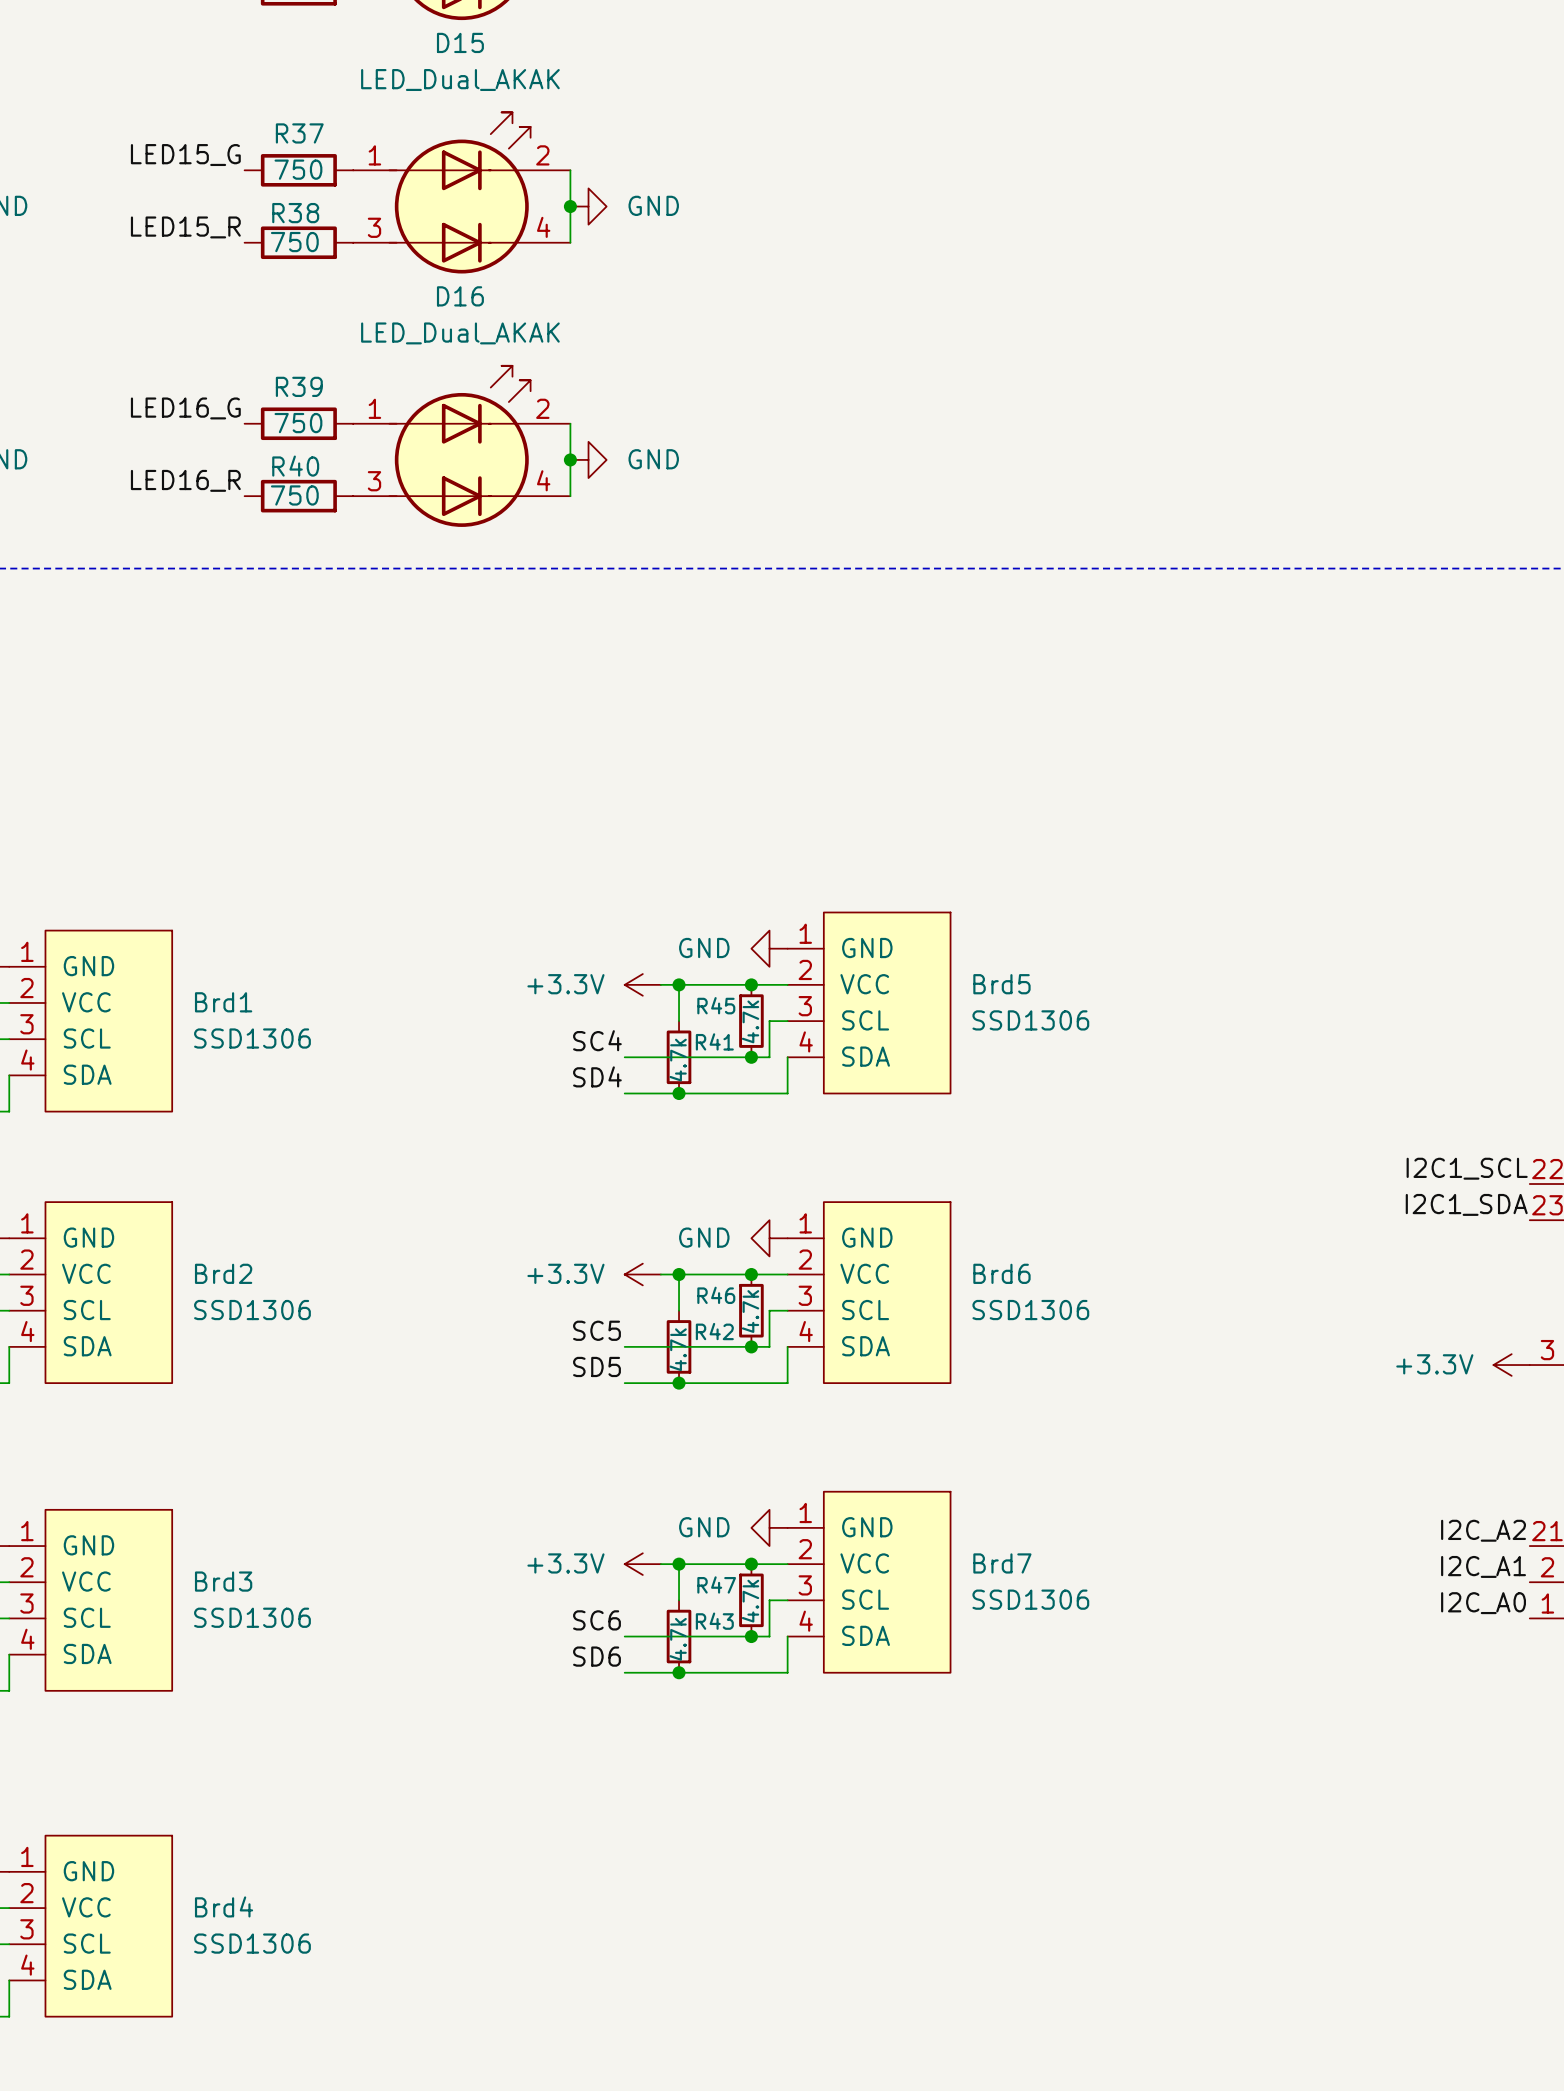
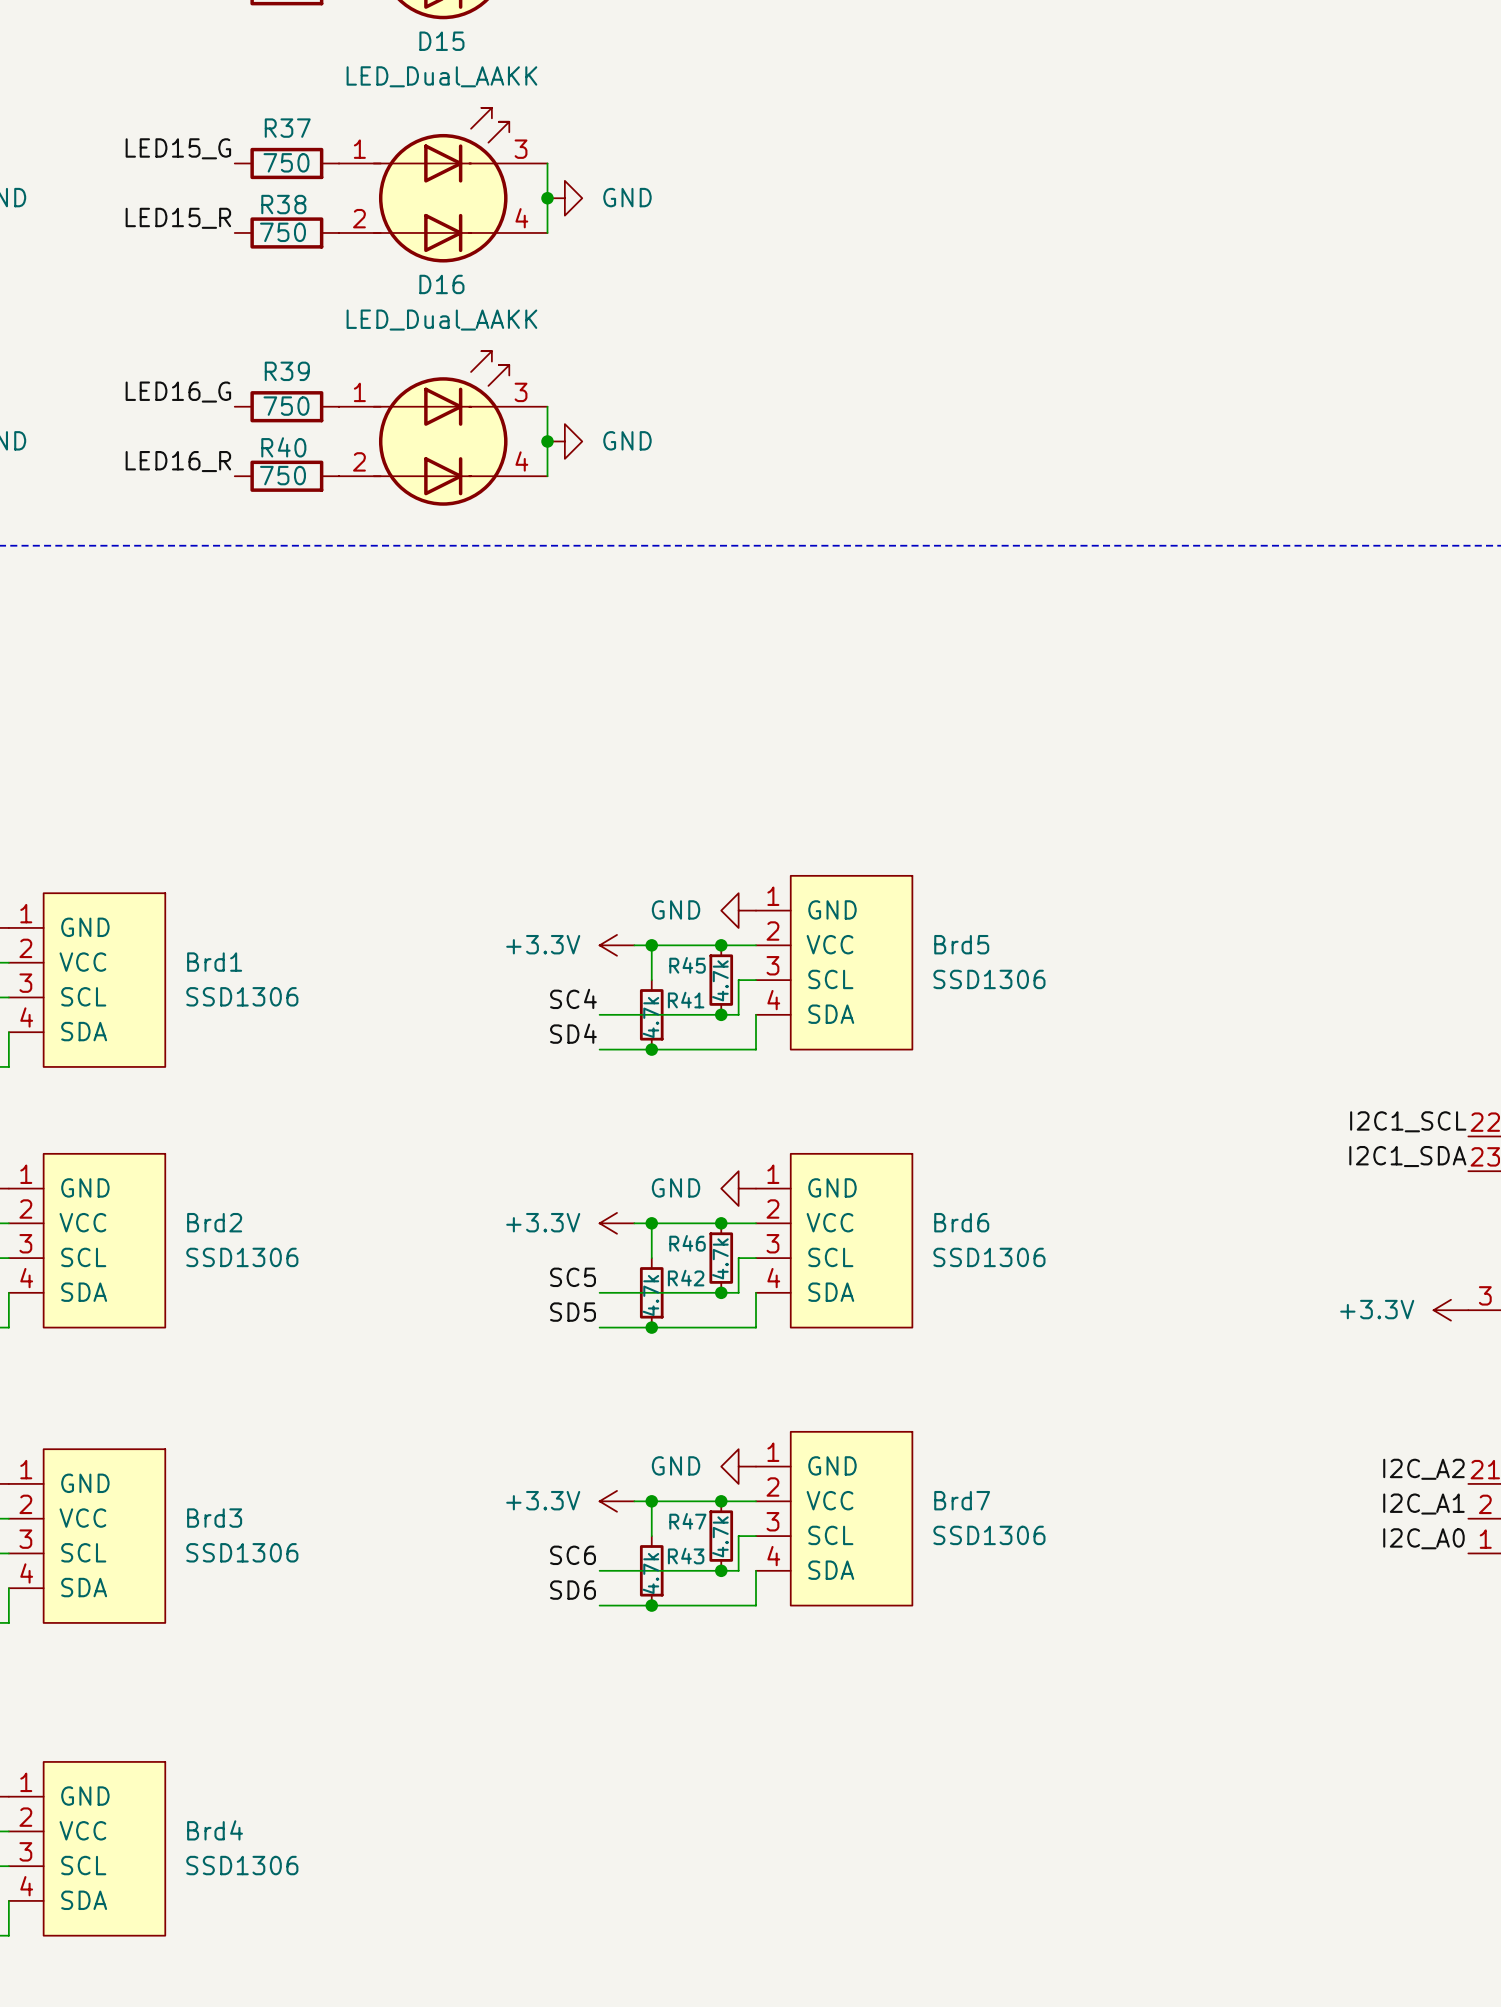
D15 value: LED_Dual_AKAK (460, 80) -> LED_Dual_AAKK (441, 76)
D15 pin number: 2 (542, 155) -> 3 (521, 149)
D15 pin number: 3 (374, 227) -> 2 (359, 218)
D16 value: LED_Dual_AKAK (460, 333) -> LED_Dual_AAKK (441, 320)
D16 pin number: 2 (542, 408) -> 3 (521, 392)
D16 pin number: 3 (374, 481) -> 2 (359, 461)

